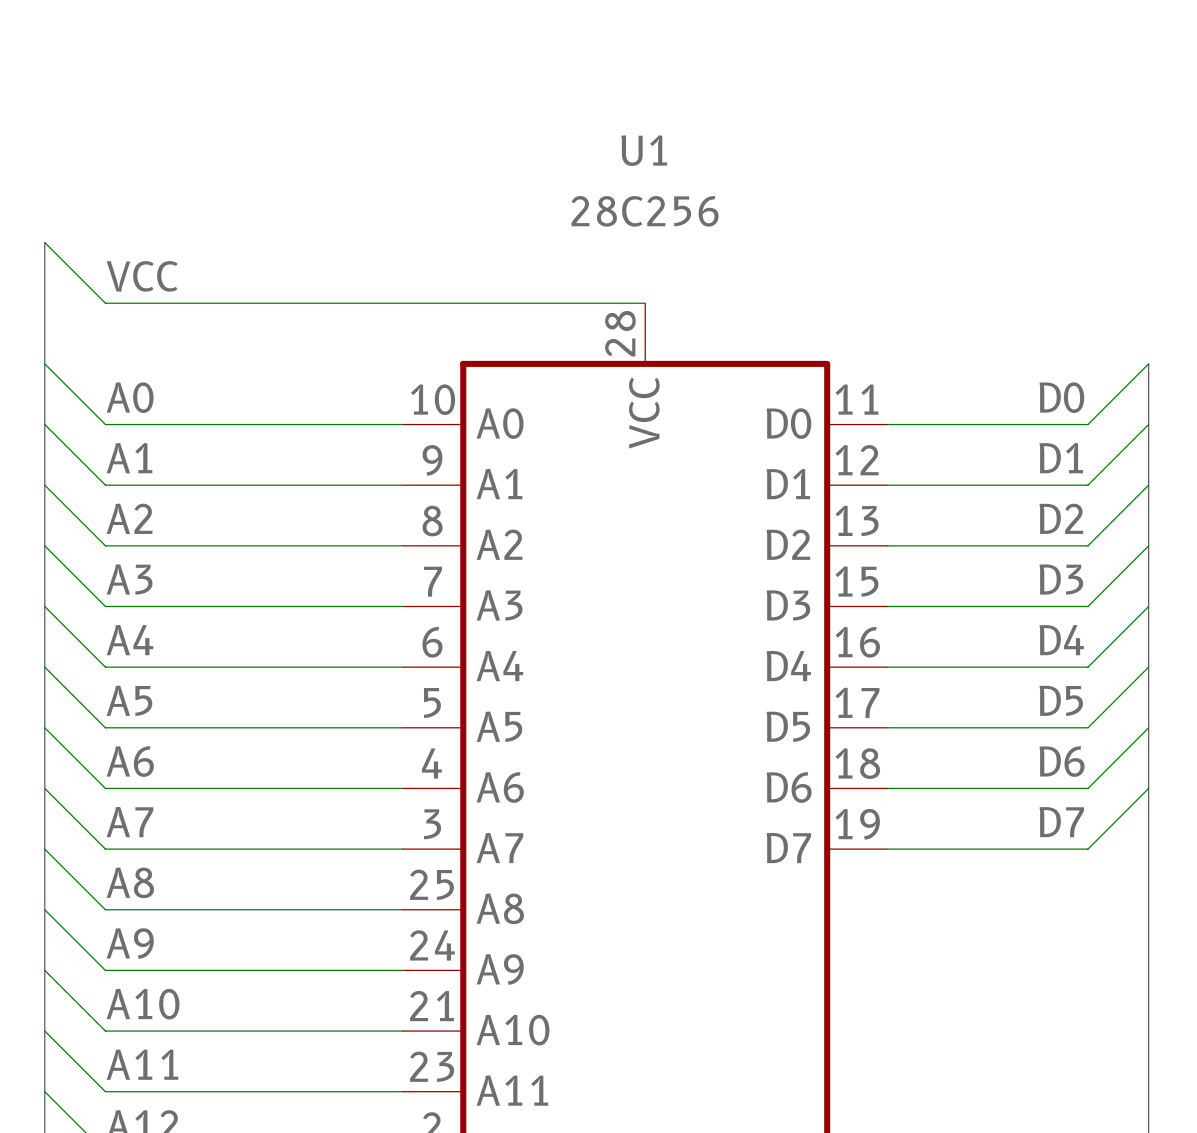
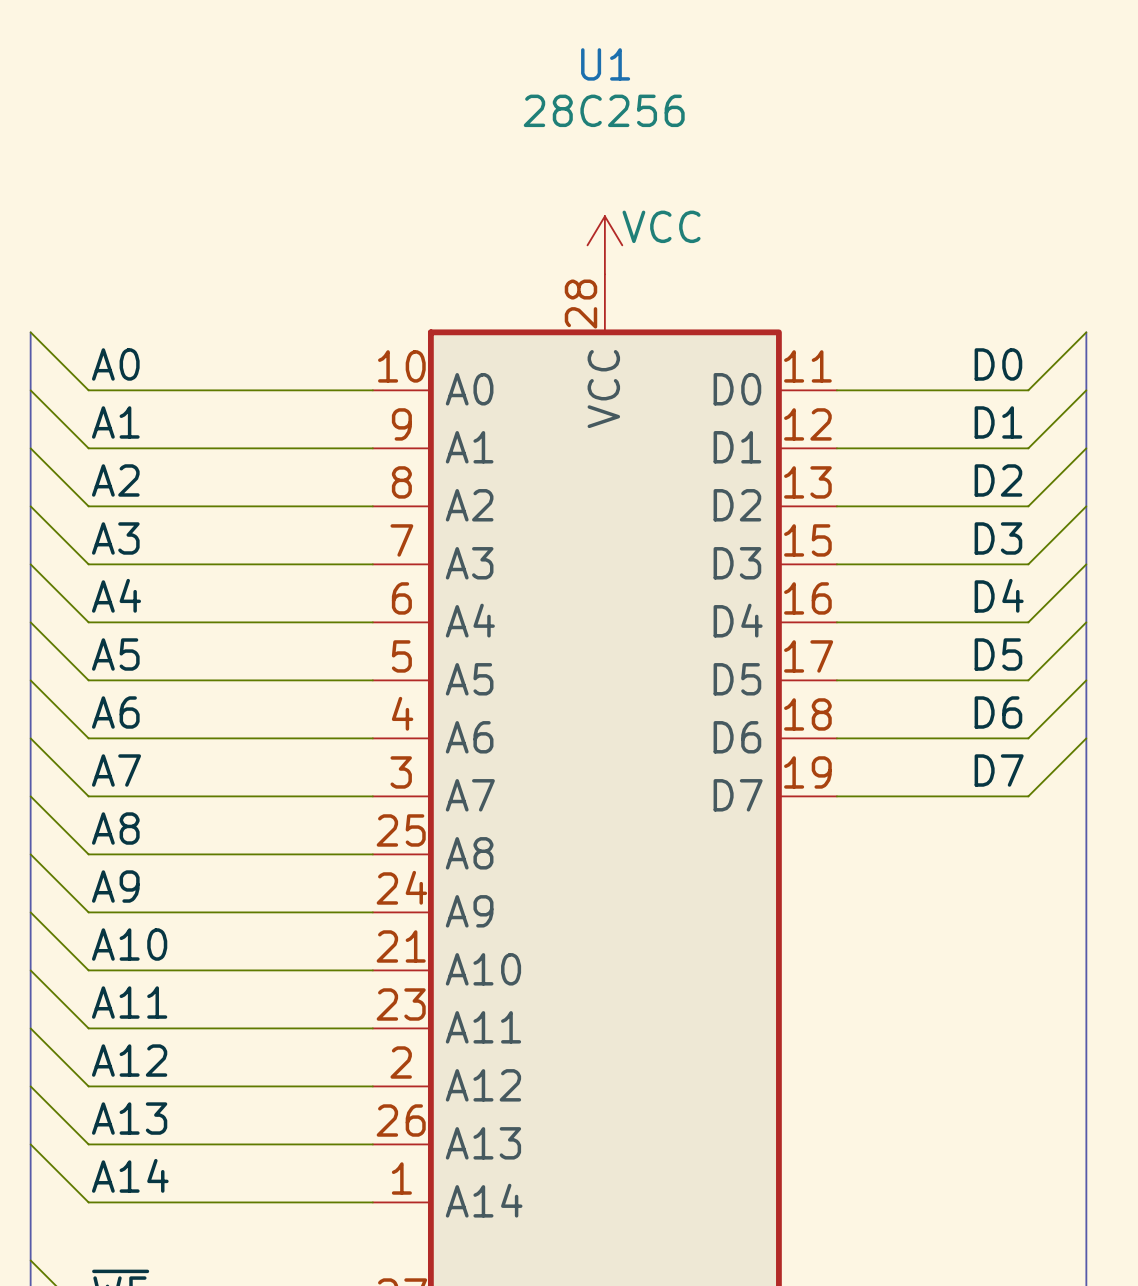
U1 name position: U1 (644, 150) -> U1 (605, 64)
U1 value position: 28C256 (645, 211) -> 28C256 (604, 110)
wire: (44, 242) (105, 303) (645, 303) -> none
bus: (44, 242) (44, 363) -> none
power symbol: none -> VCC (604, 245)
label: VCC (142, 276) -> none

